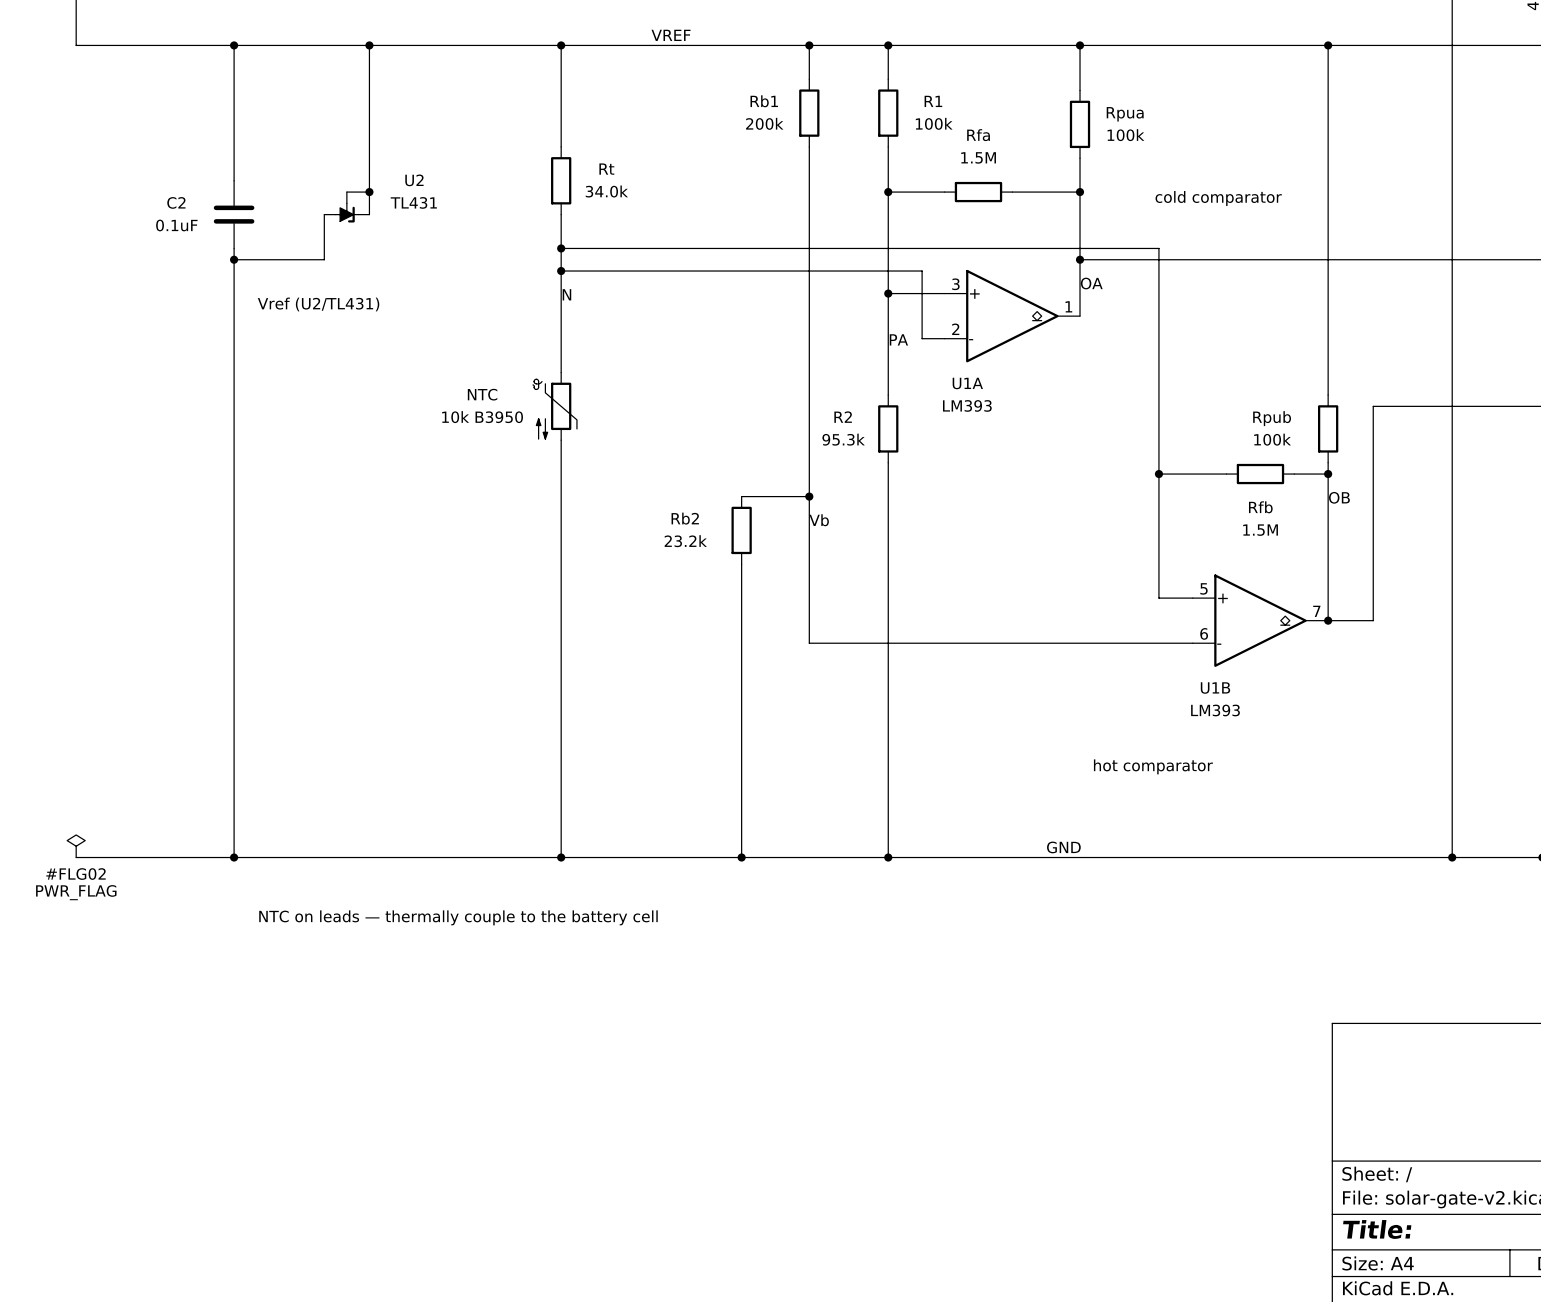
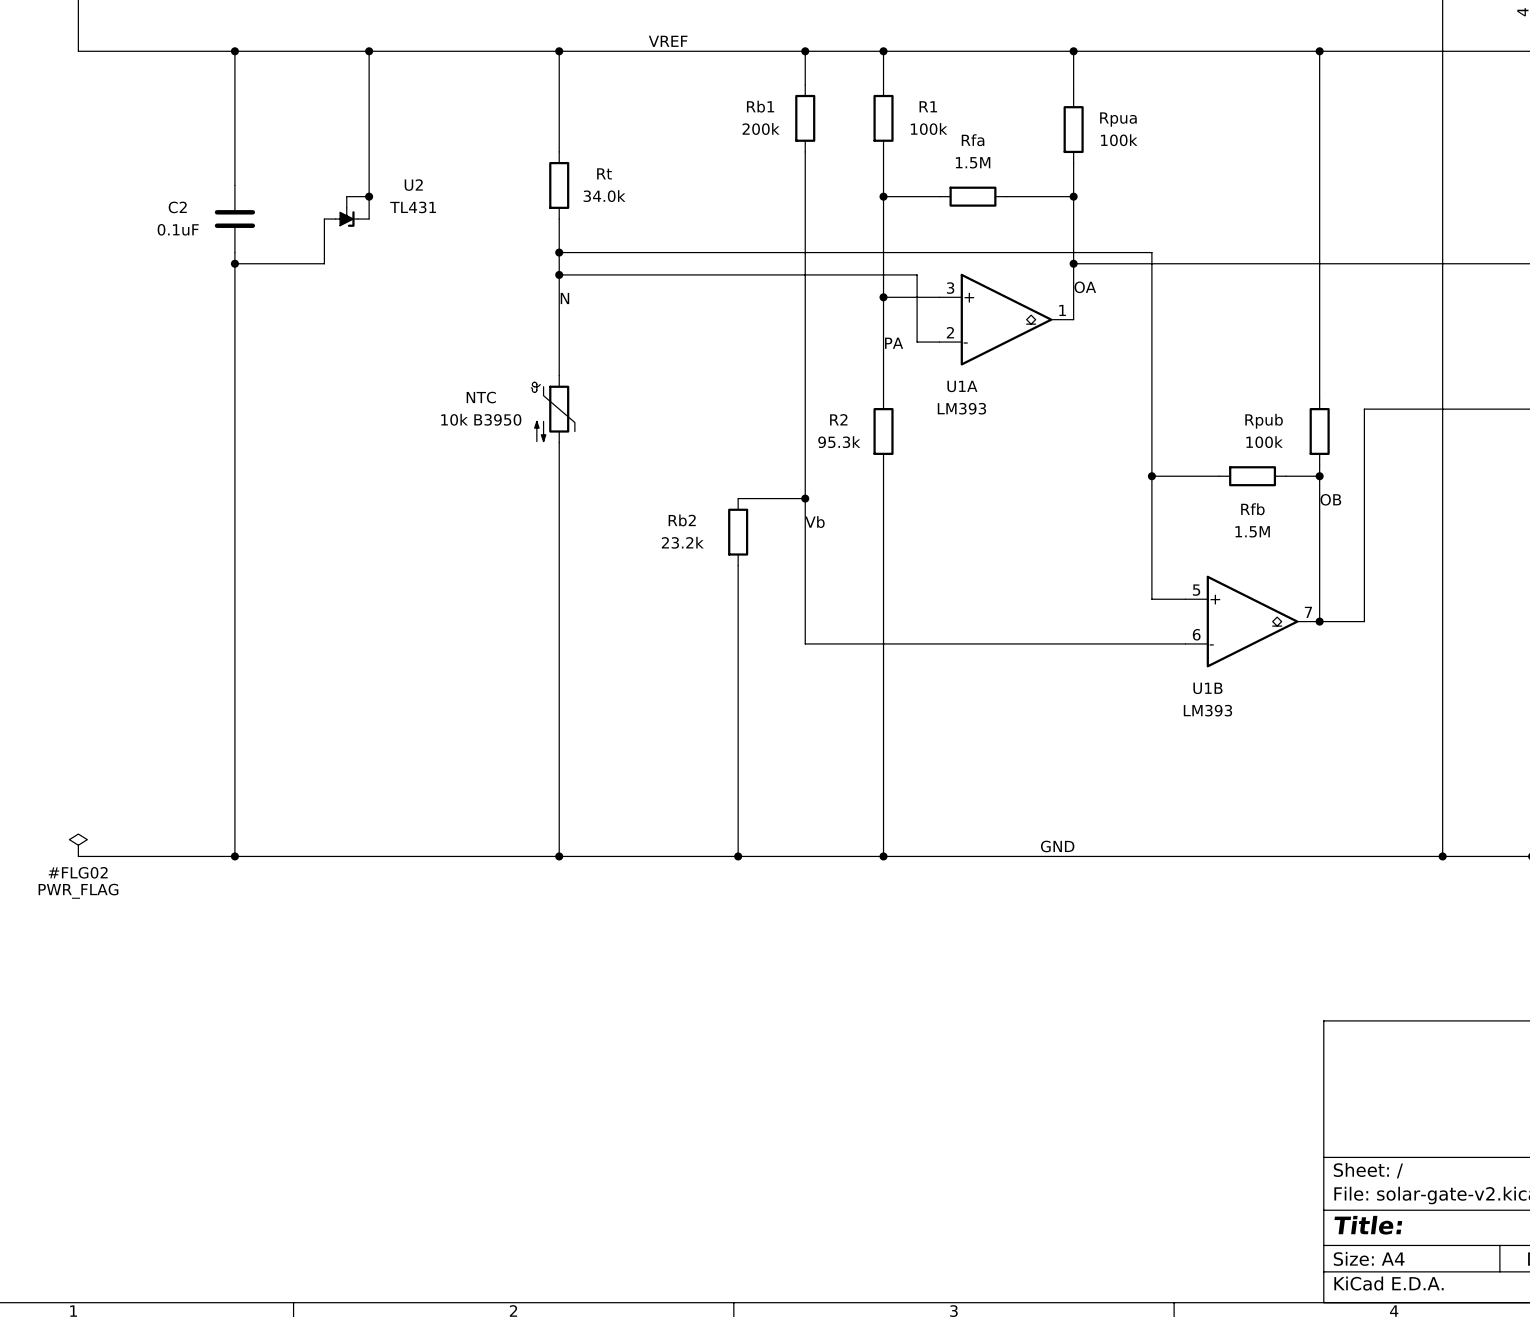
text: cold comparator (1218, 198) -> none
text: Vref (U2/TL431) (318, 304) -> none
text: hot comparator (1153, 766) -> none
text: NTC on leads — thermally couple to the battery cell (458, 917) -> none

